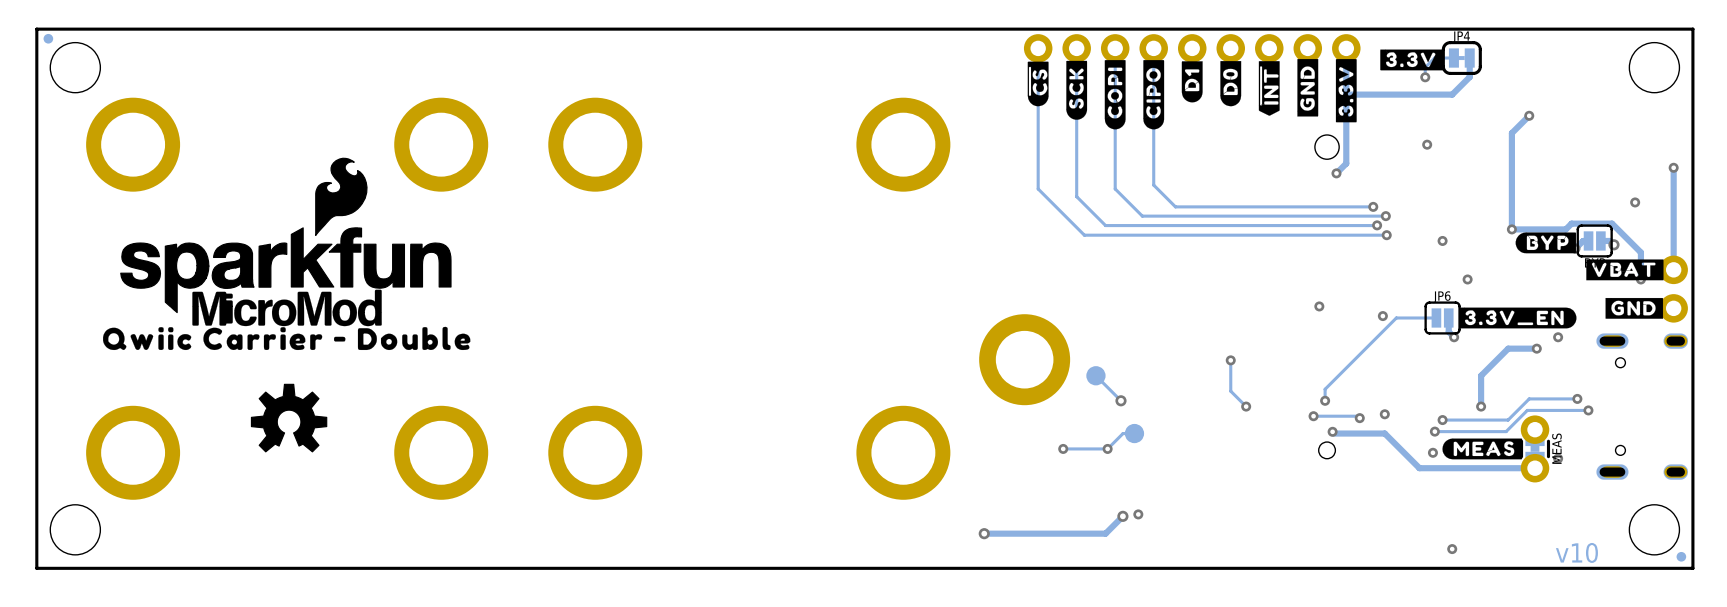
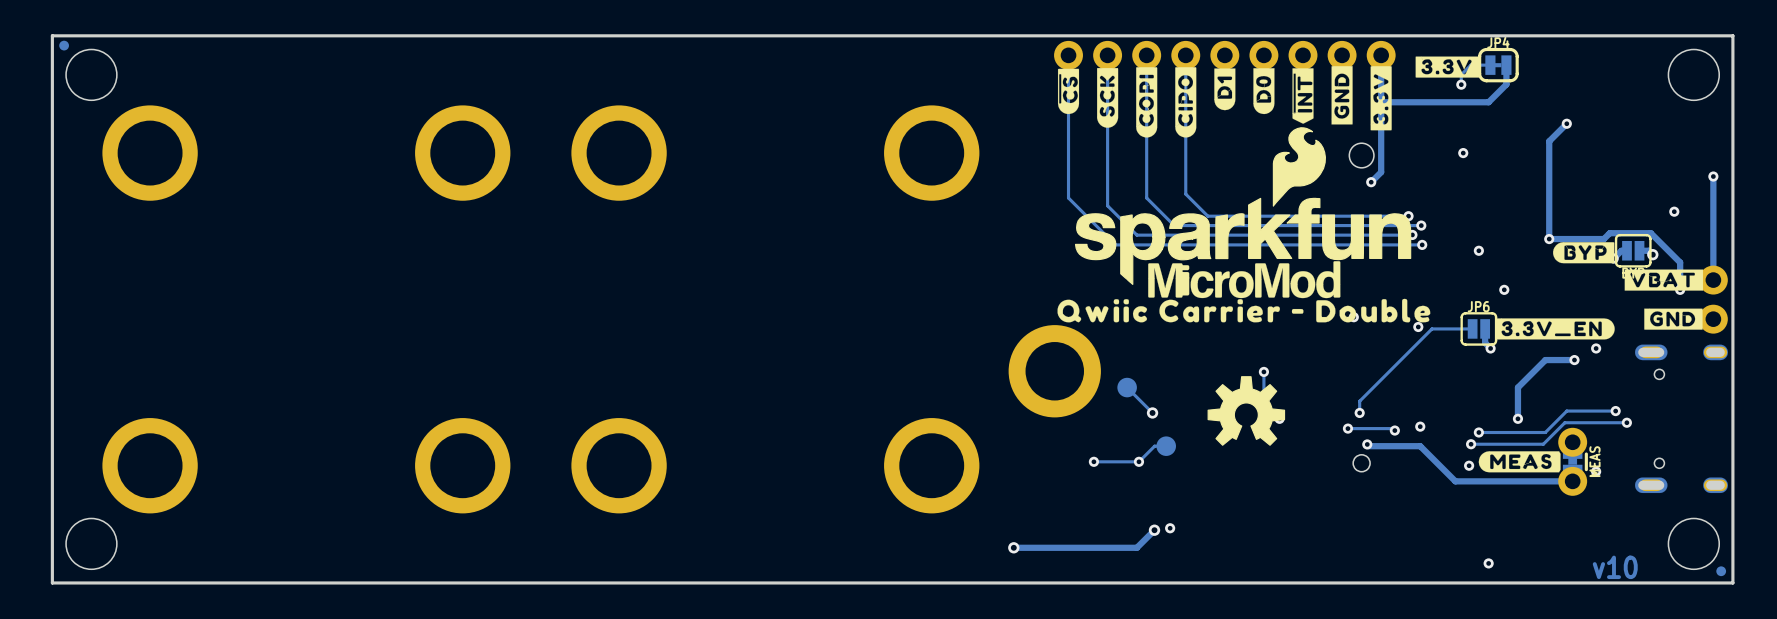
drawing: none -> [1057, 127, 1431, 323]
drawing: [103, 157, 471, 351] -> none
drawing: none -> [1207, 376, 1286, 446]
drawing: [250, 383, 328, 453] -> none

